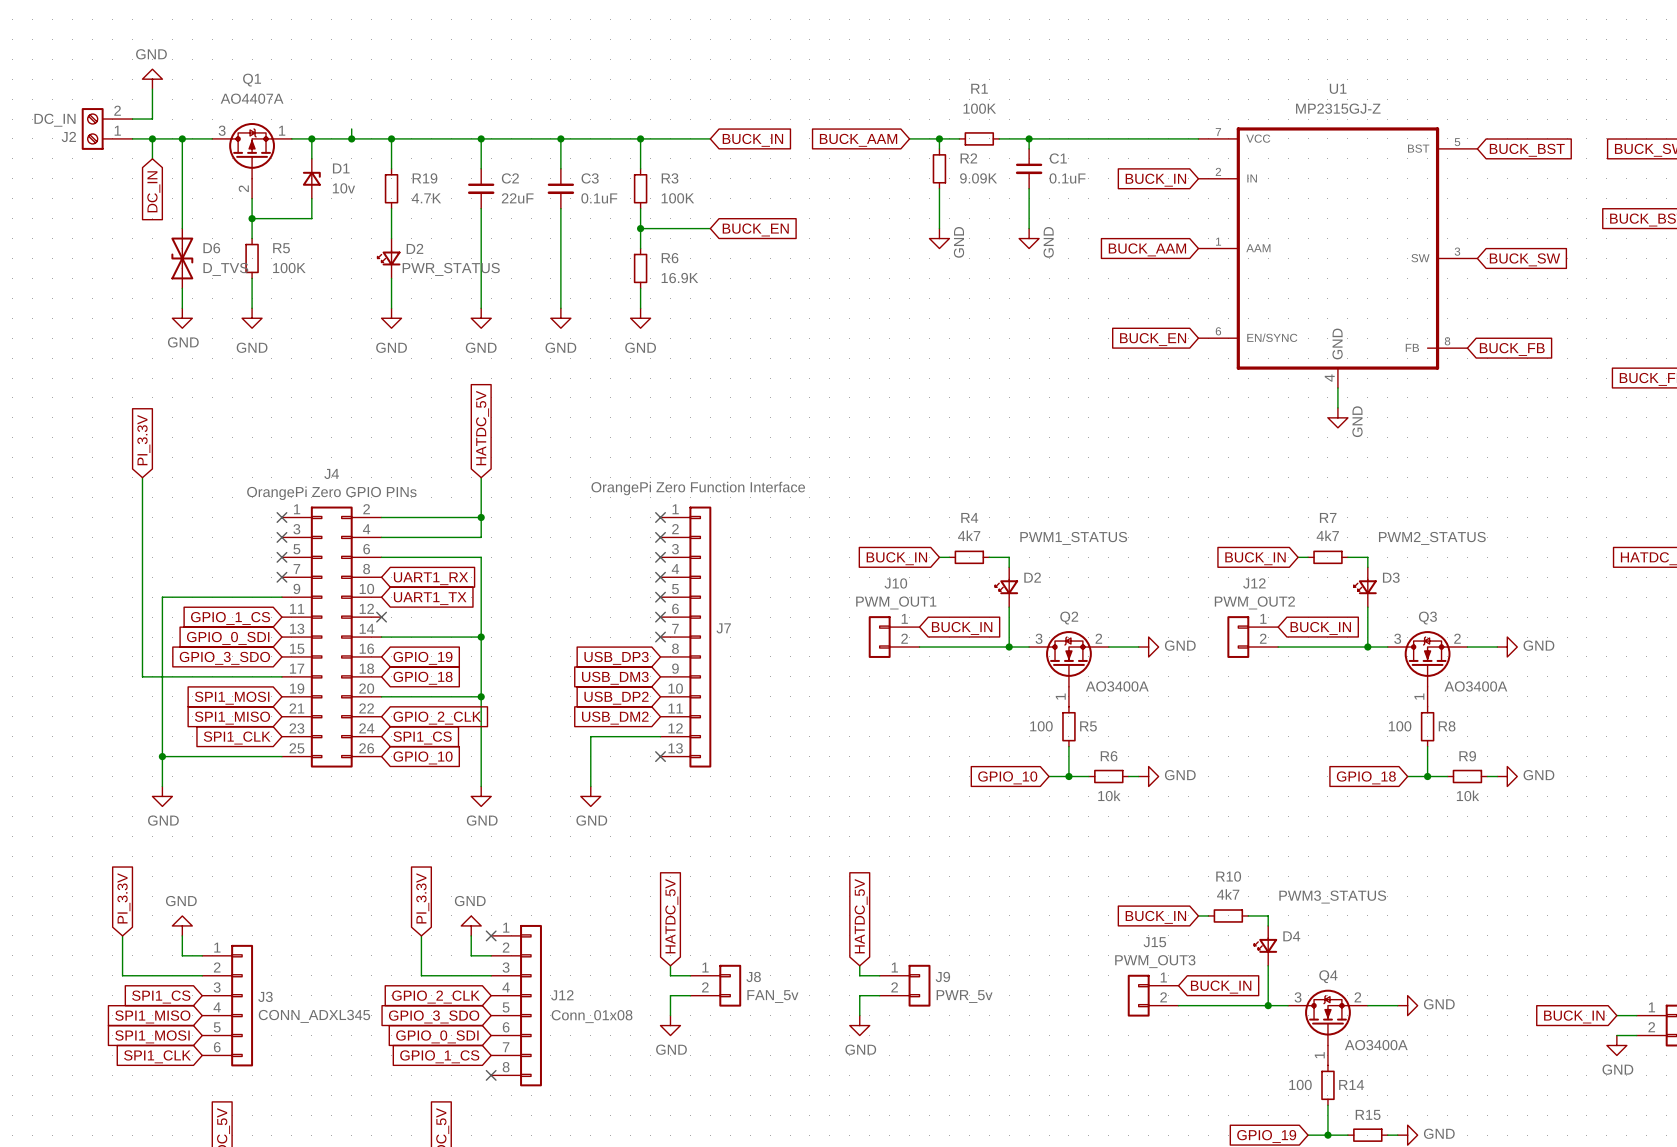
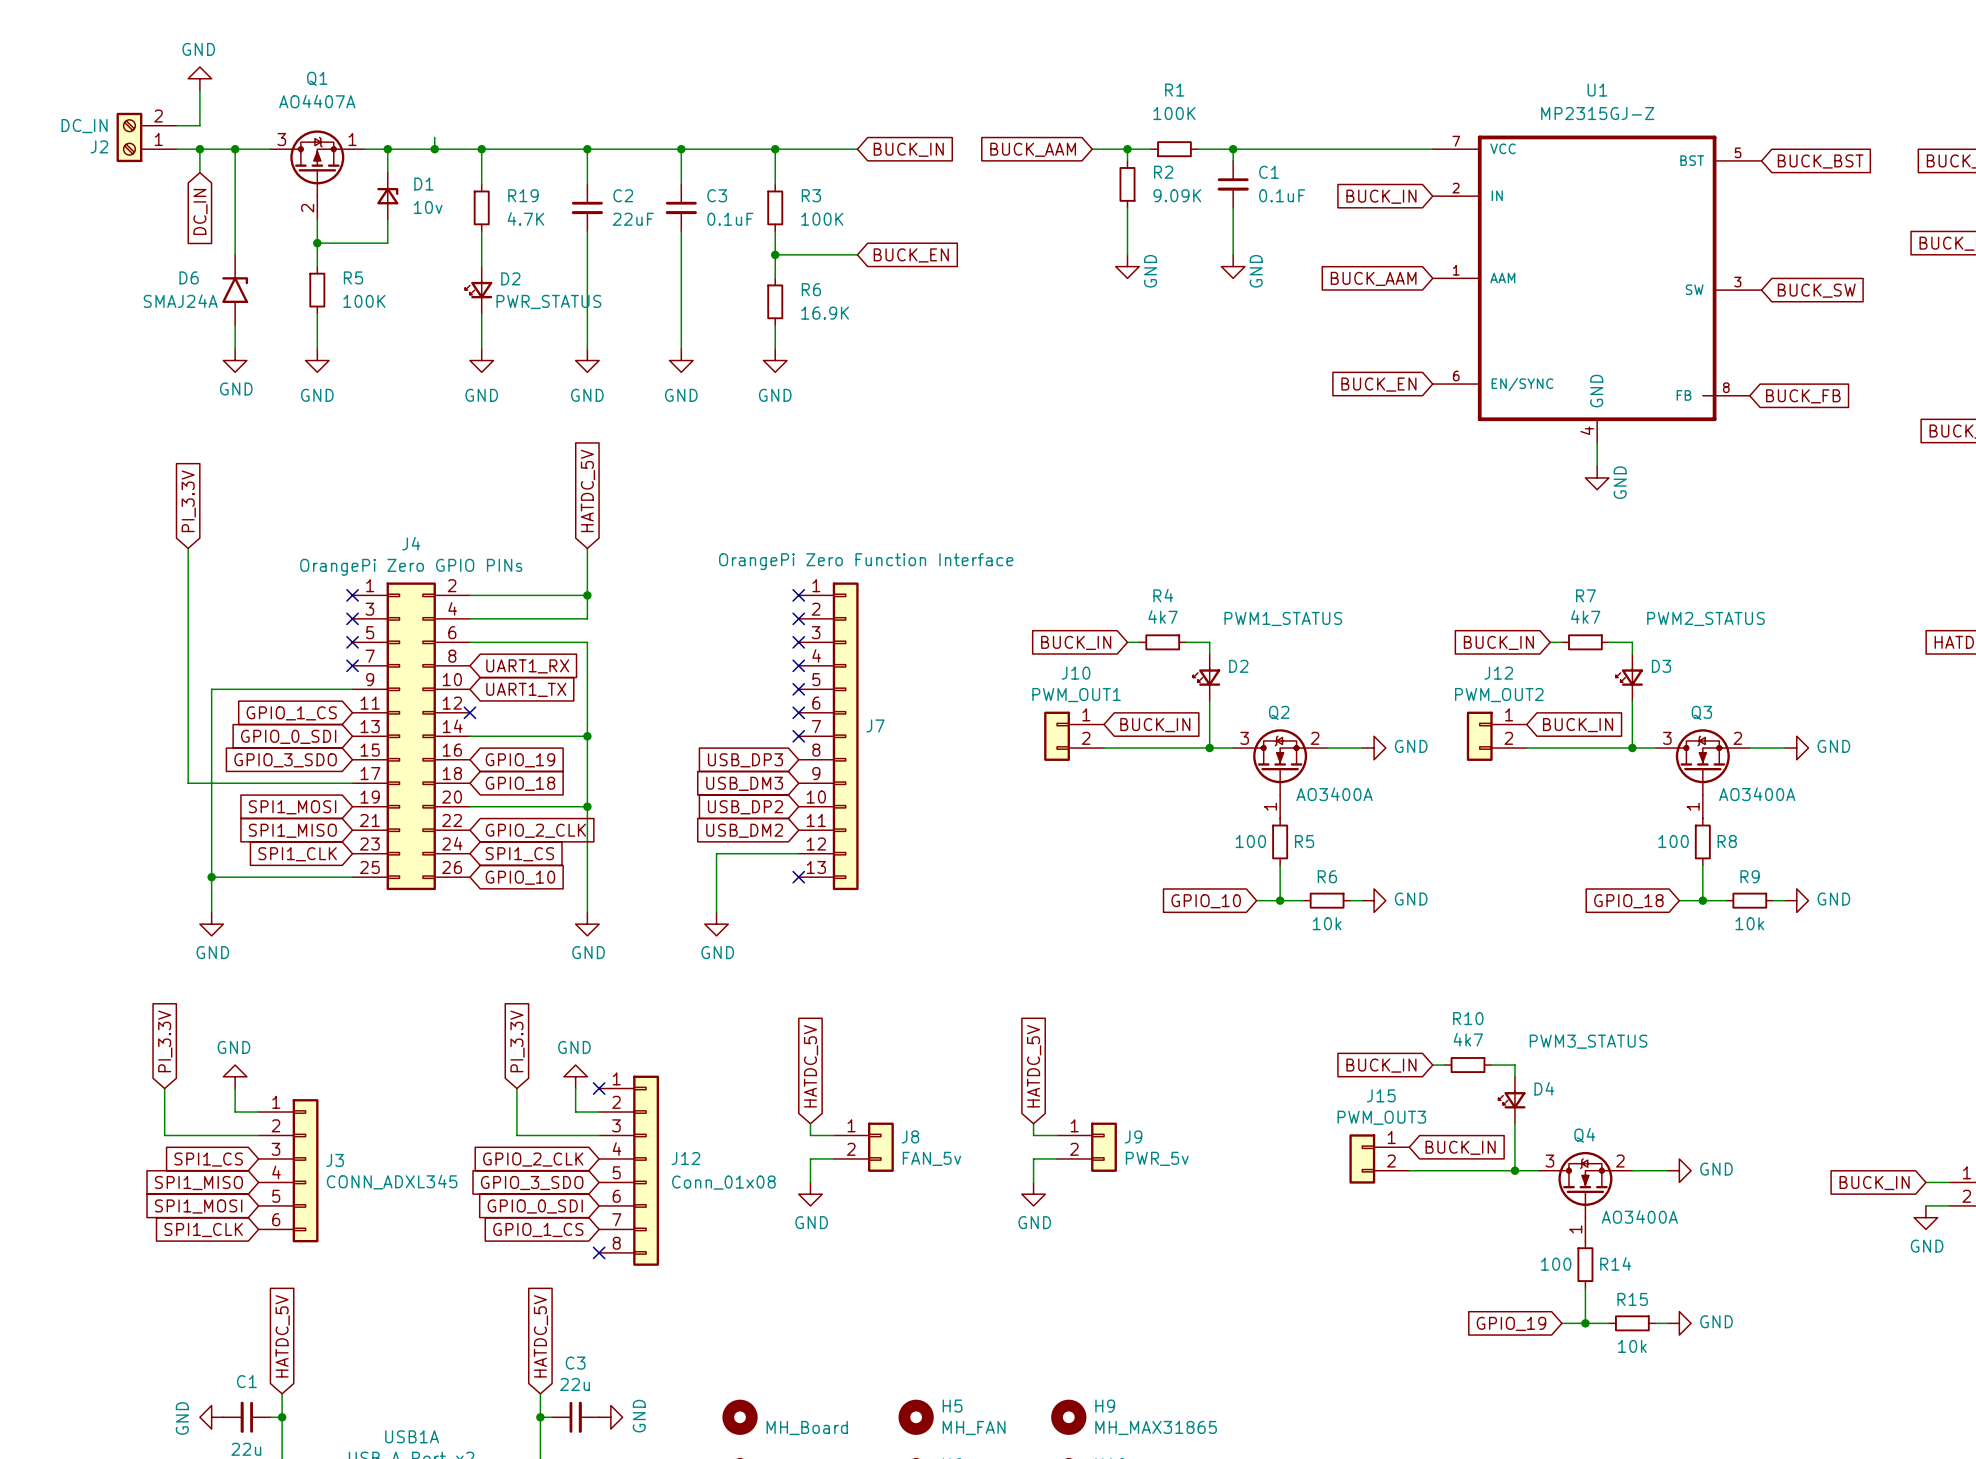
D6 symbol: [171, 228, 194, 289] -> [222, 254, 249, 326]
D6 name position: D6 (211, 248) -> D6 (189, 277)
D6 value: D_TVS (225, 269) -> SMAJ24A (180, 301)

